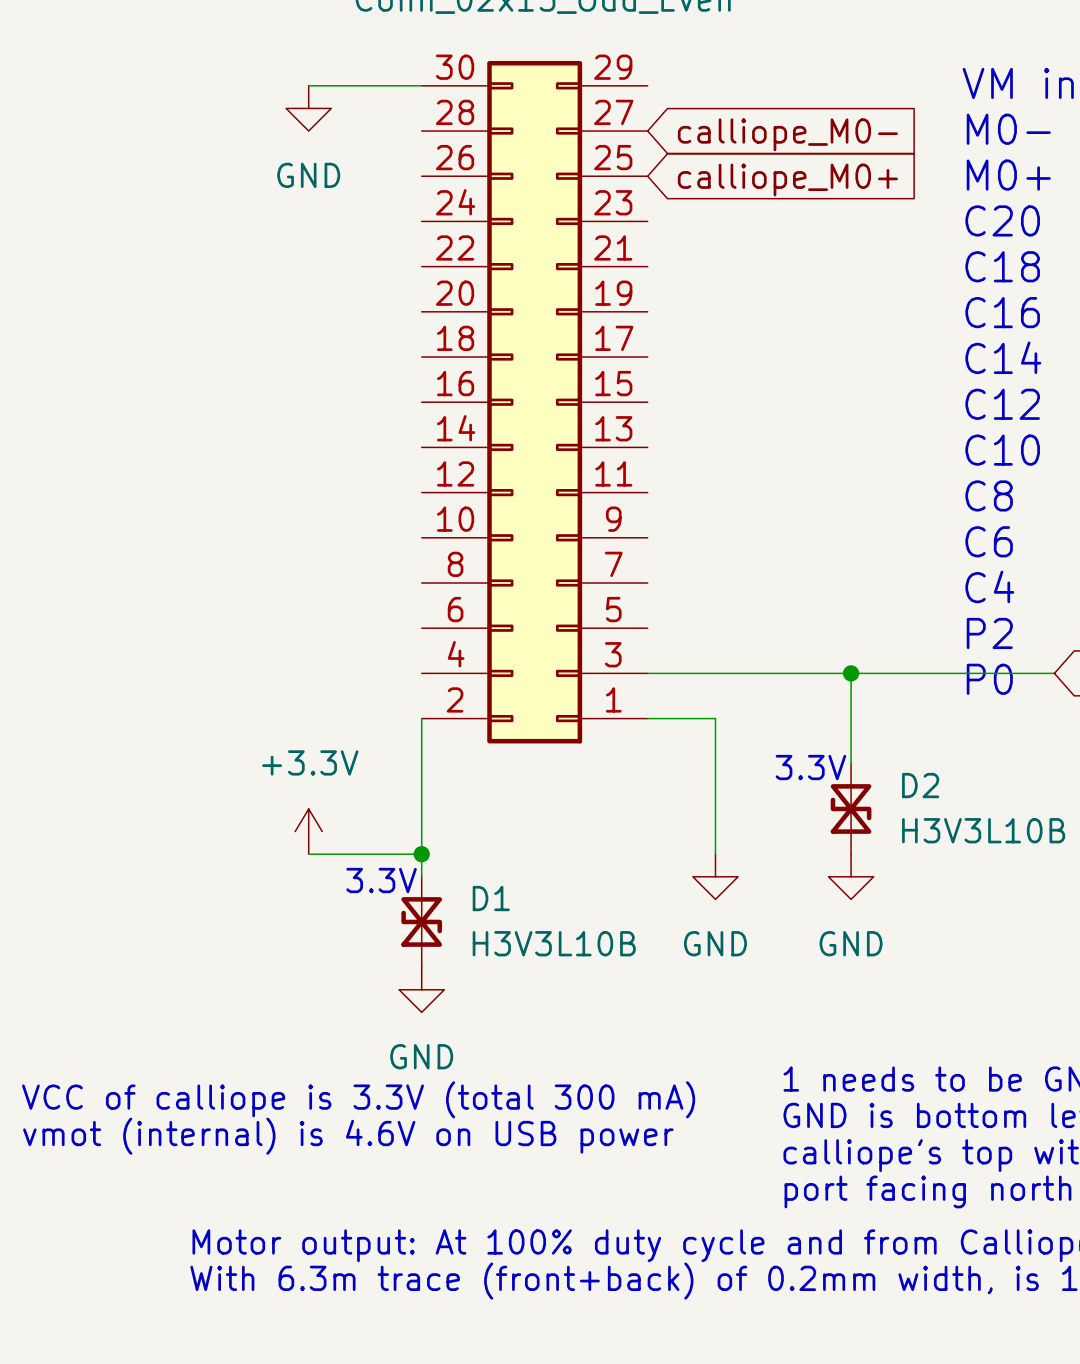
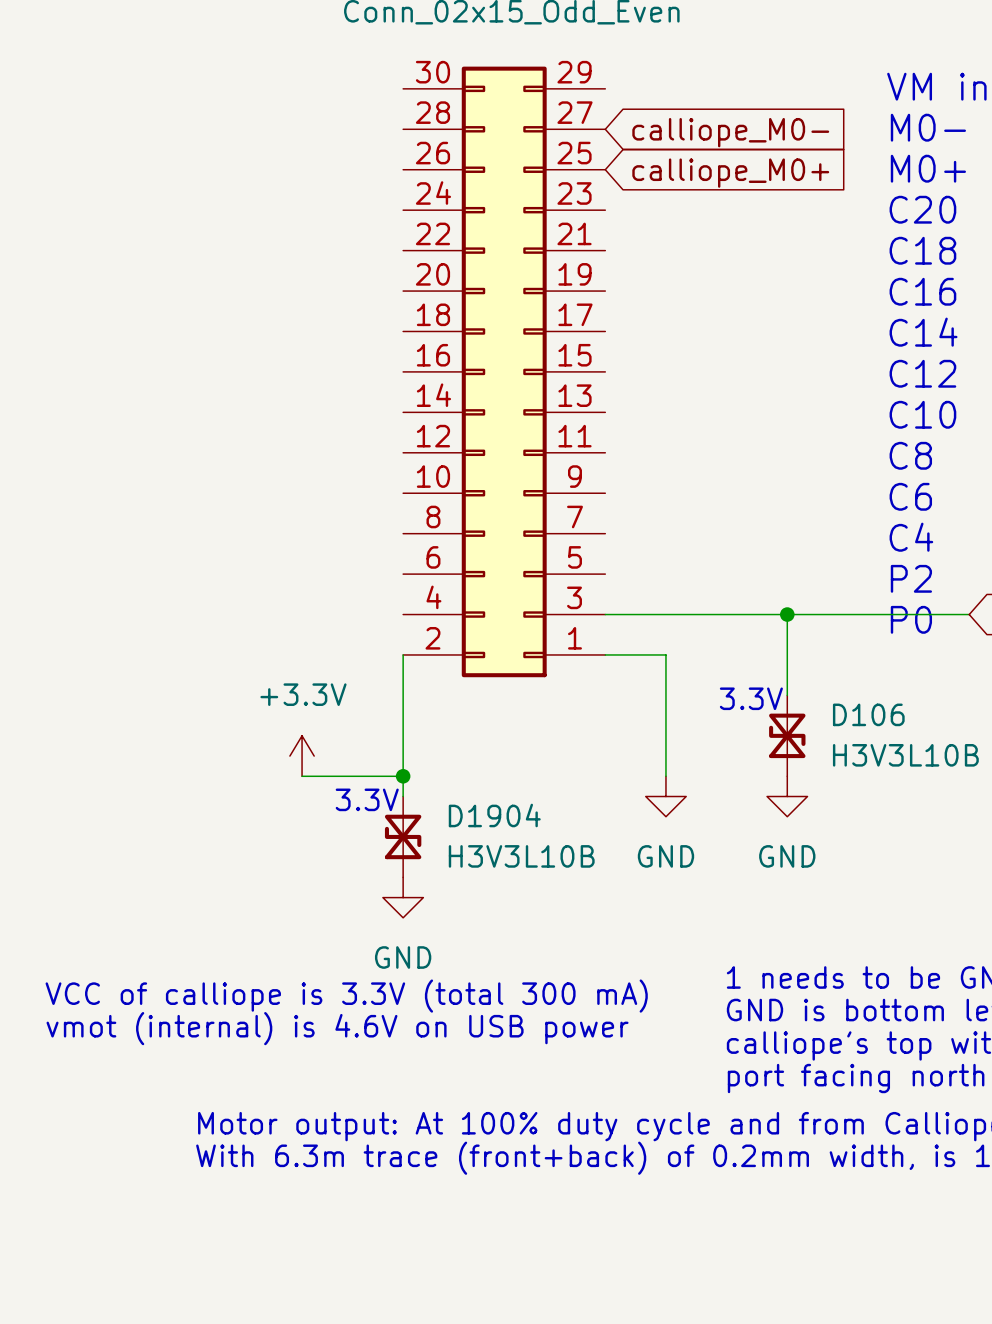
wire: (308, 85) (421, 85) -> none
power symbol: GND (308, 108) -> none
D2 name: D2 (920, 785) -> D106 (868, 714)
D1 name: D1 (491, 898) -> D1904 (494, 815)

